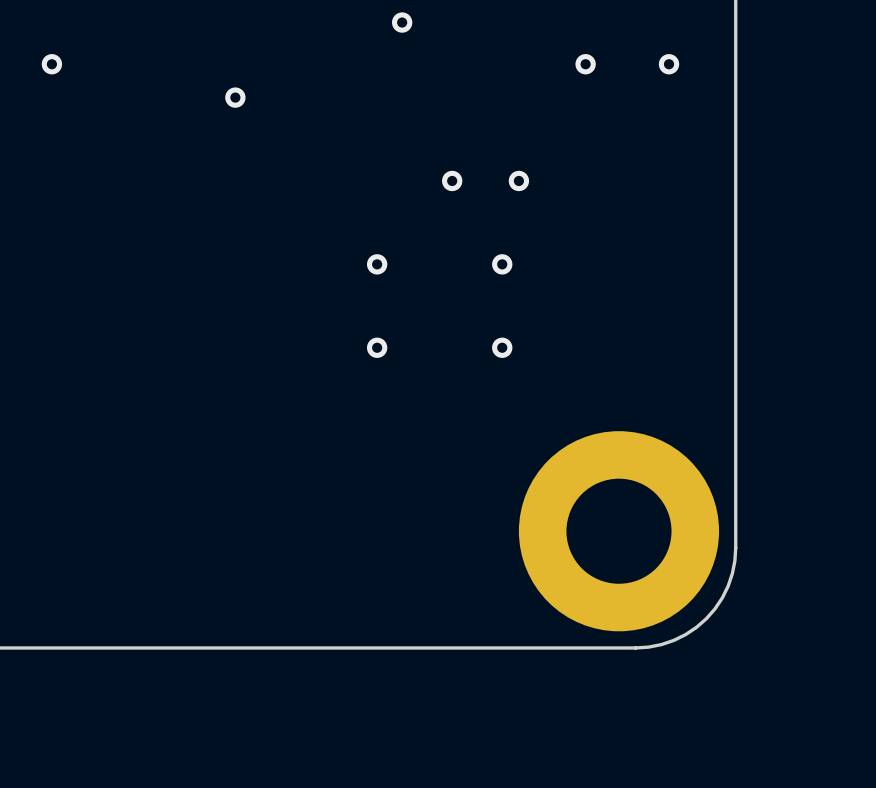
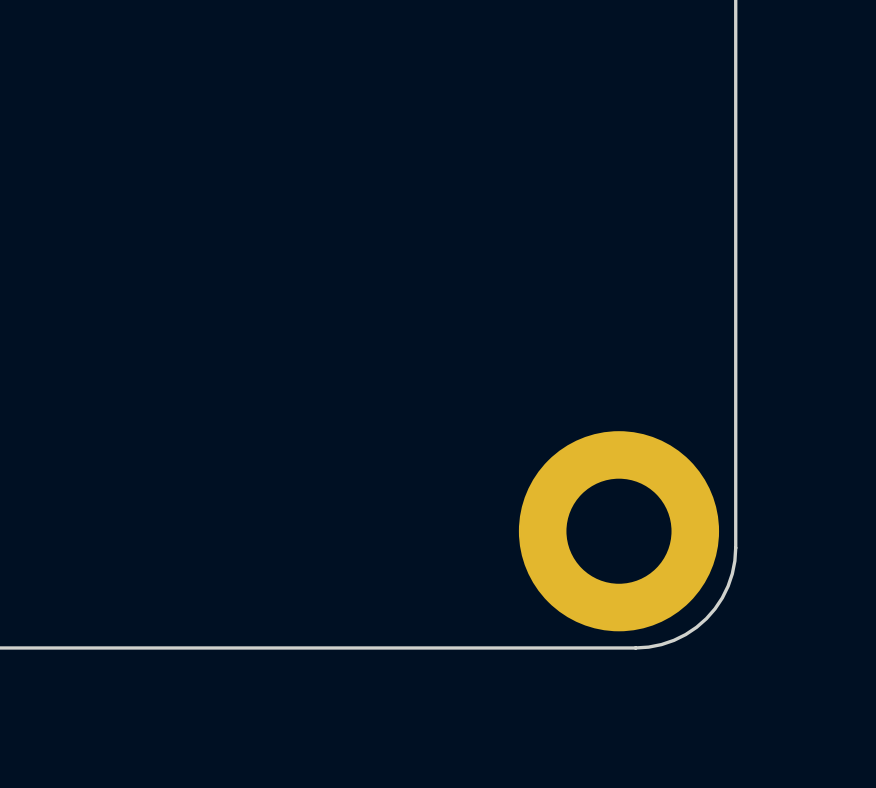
via: (402, 22) -> none
via: (51, 64) -> none
via: (585, 64) -> none
via: (669, 64) -> none
via: (235, 97) -> none
via: (452, 180) -> none
via: (518, 180) -> none
via: (377, 264) -> none
via: (502, 264) -> none
via: (377, 347) -> none
via: (502, 347) -> none

